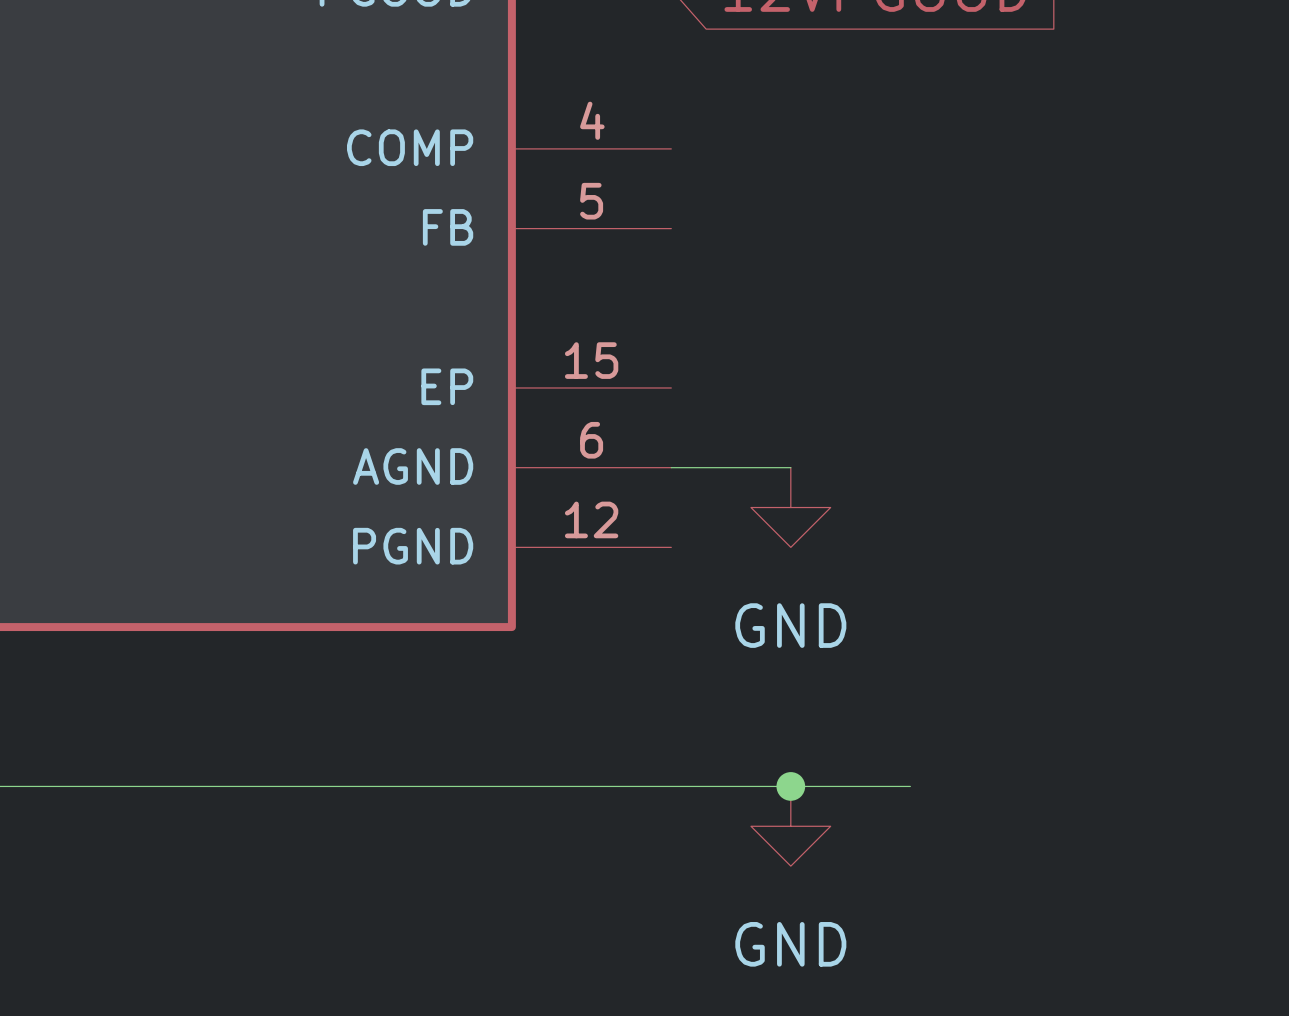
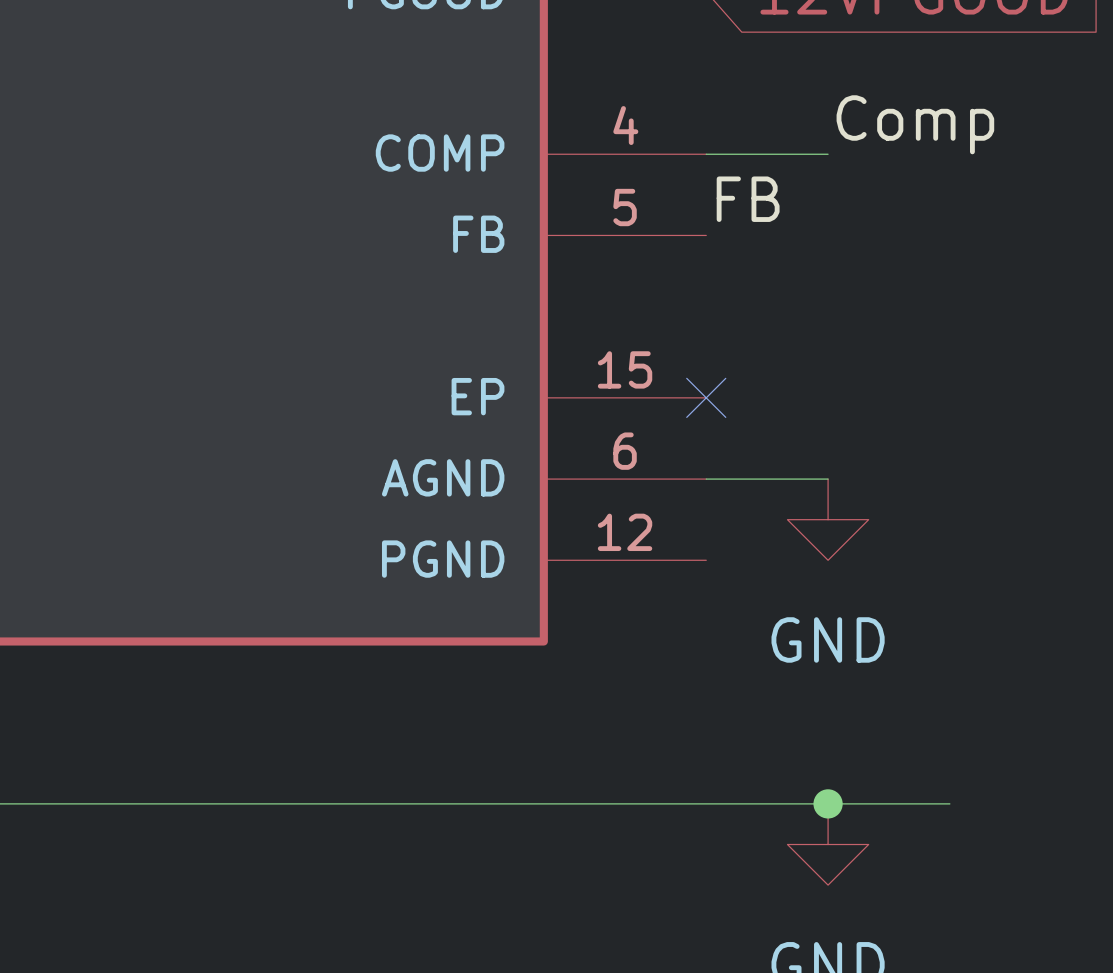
label: none -> Comp (915, 124)
wire: none -> (706, 154) (828, 154)
label: none -> FB (748, 199)
no-connect mark: none -> (706, 397)

